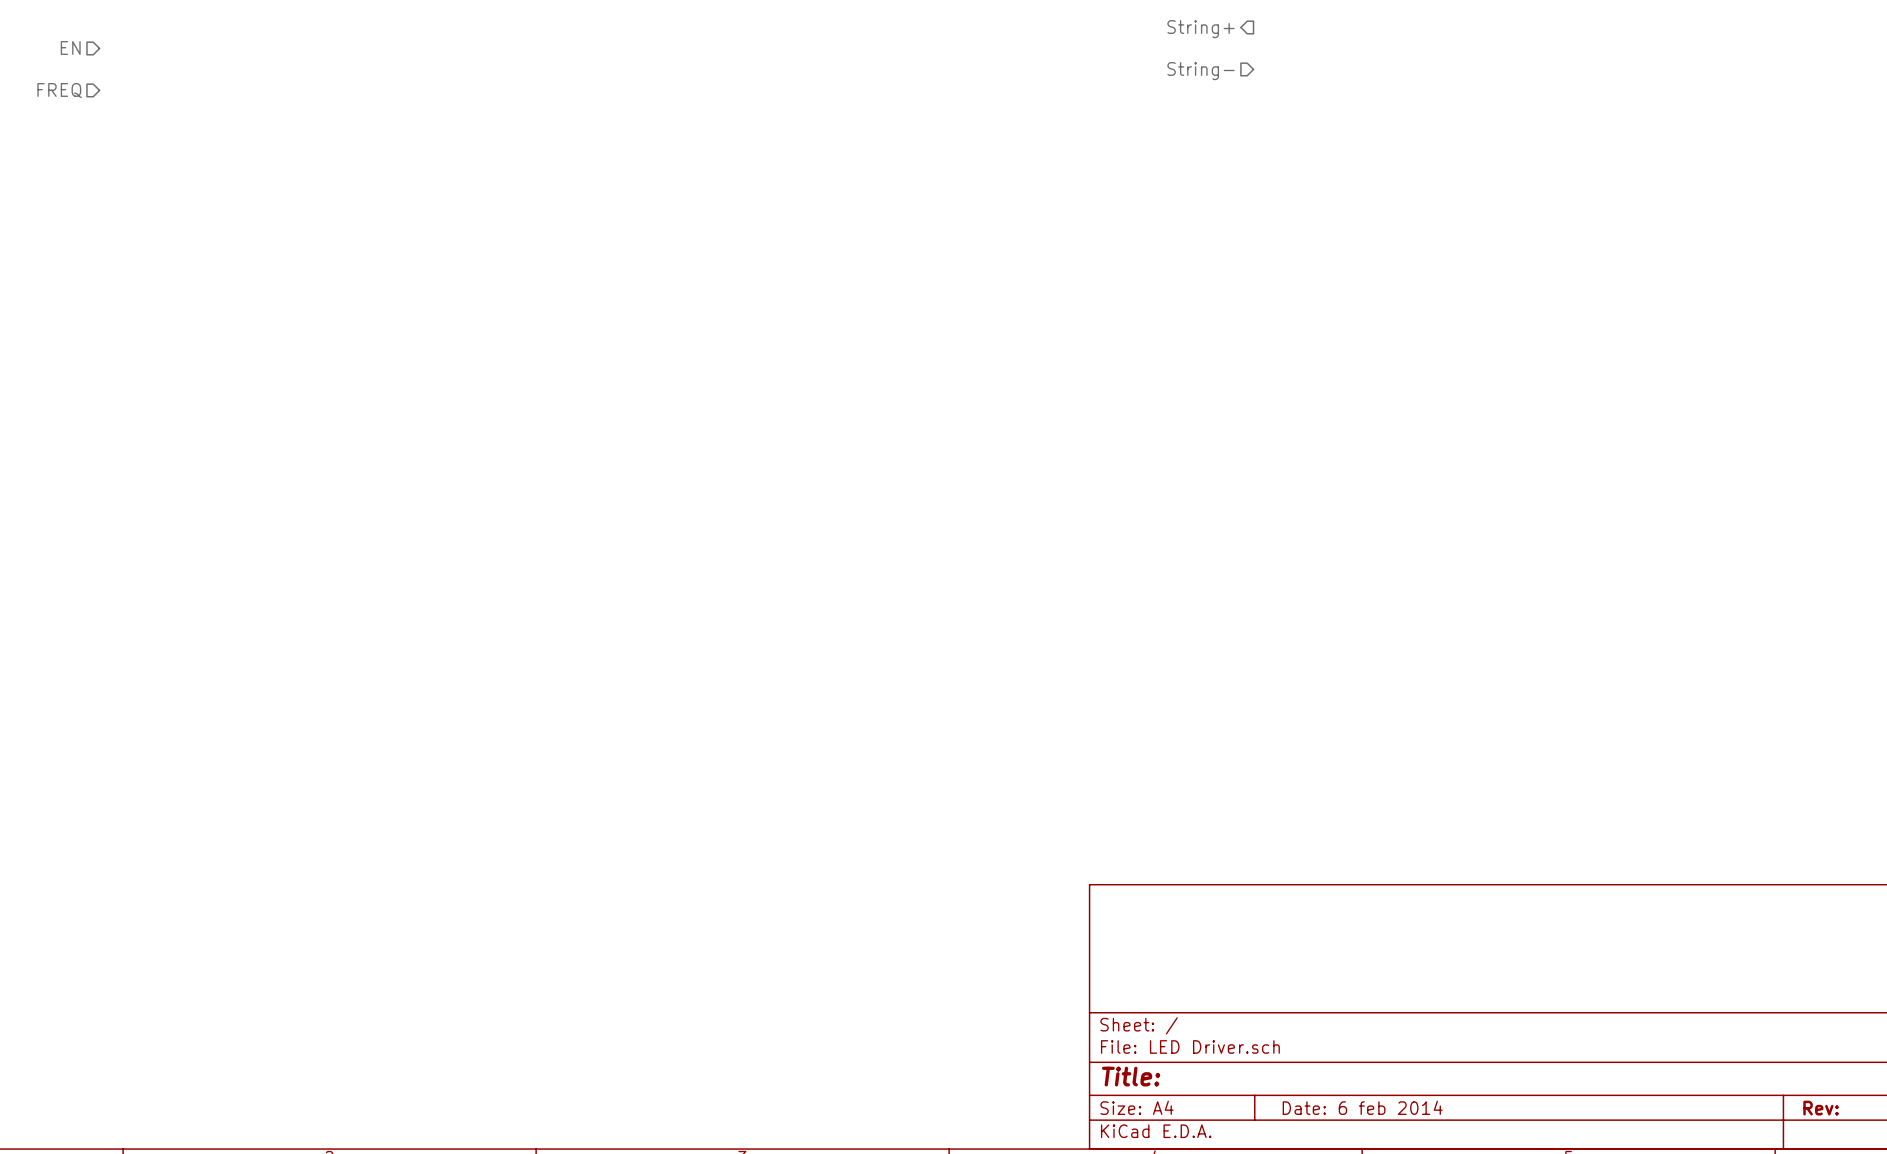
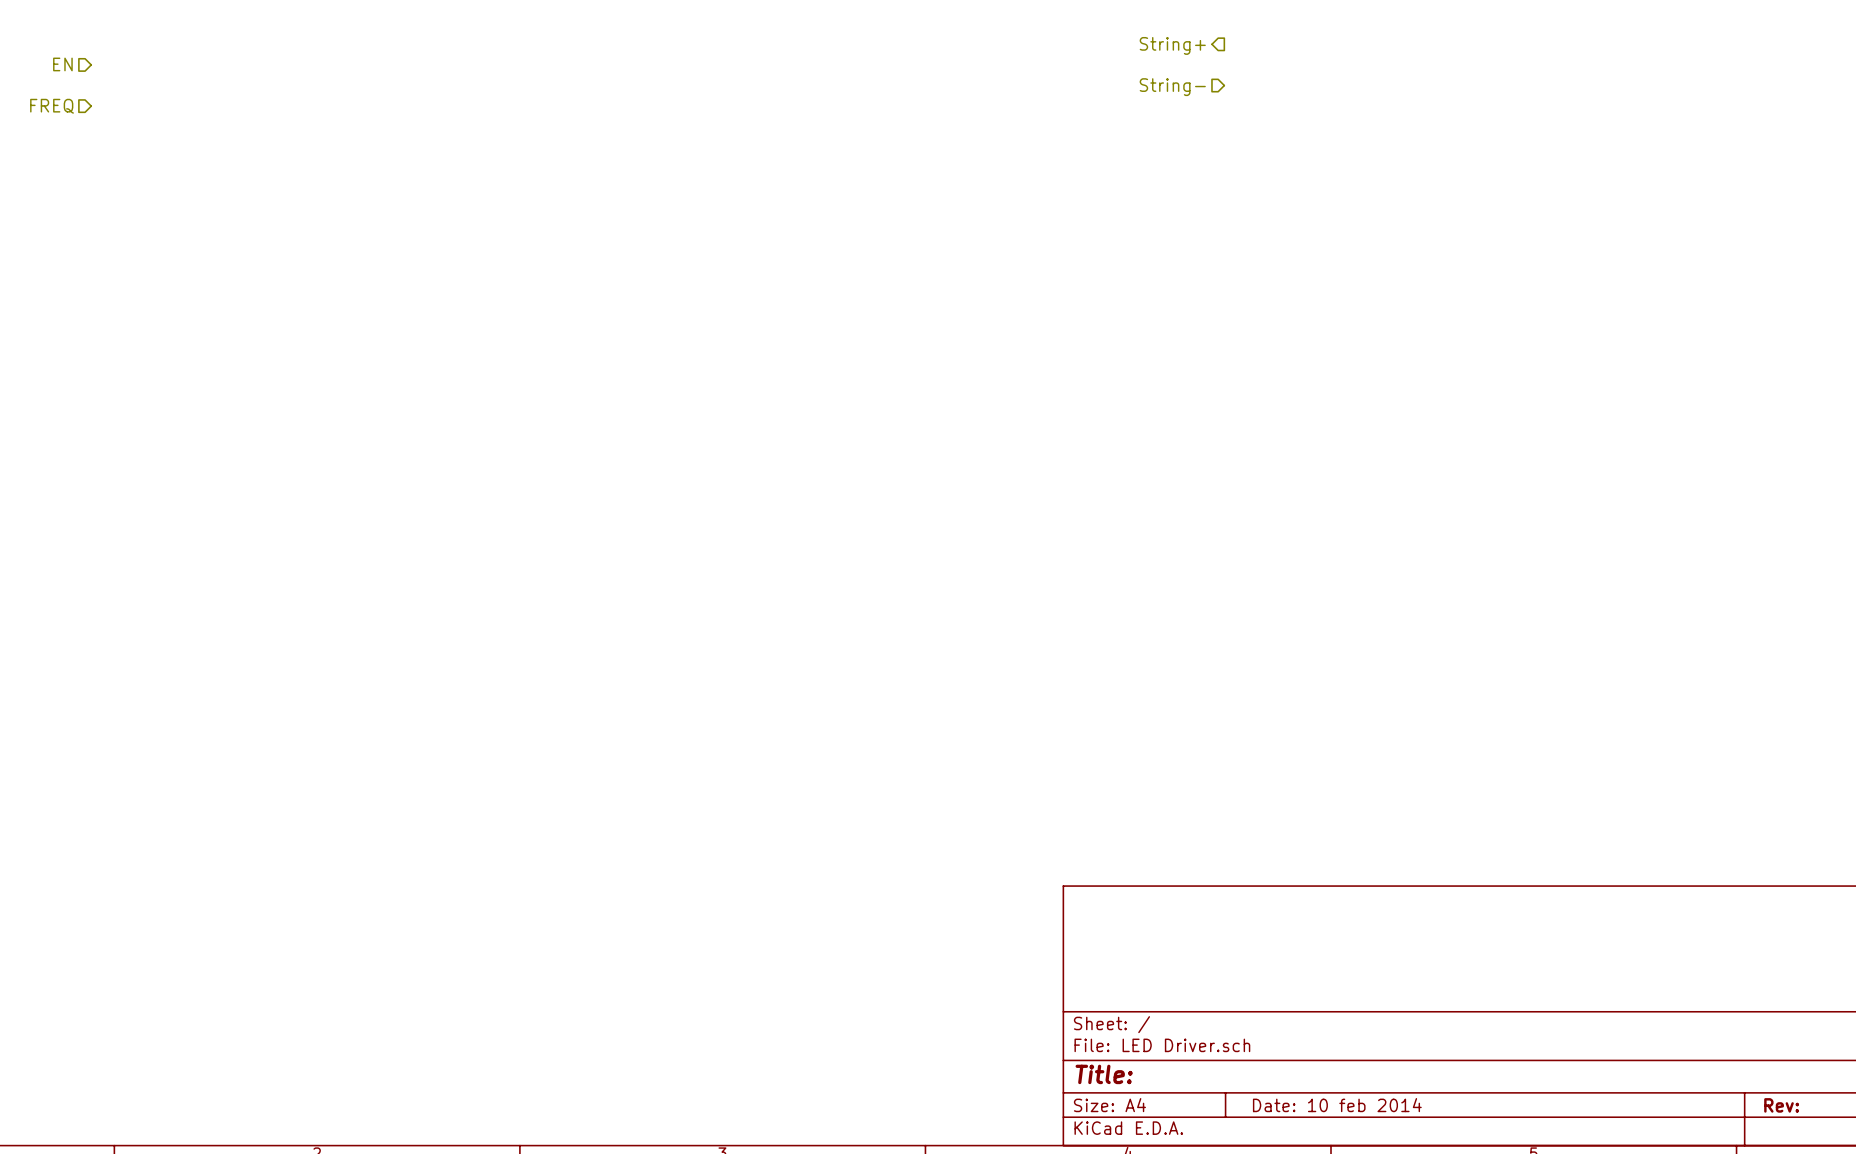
title block: Date: 6 feb 2014 (1362, 1107) -> Date: 10 feb 2014 (1337, 1105)

